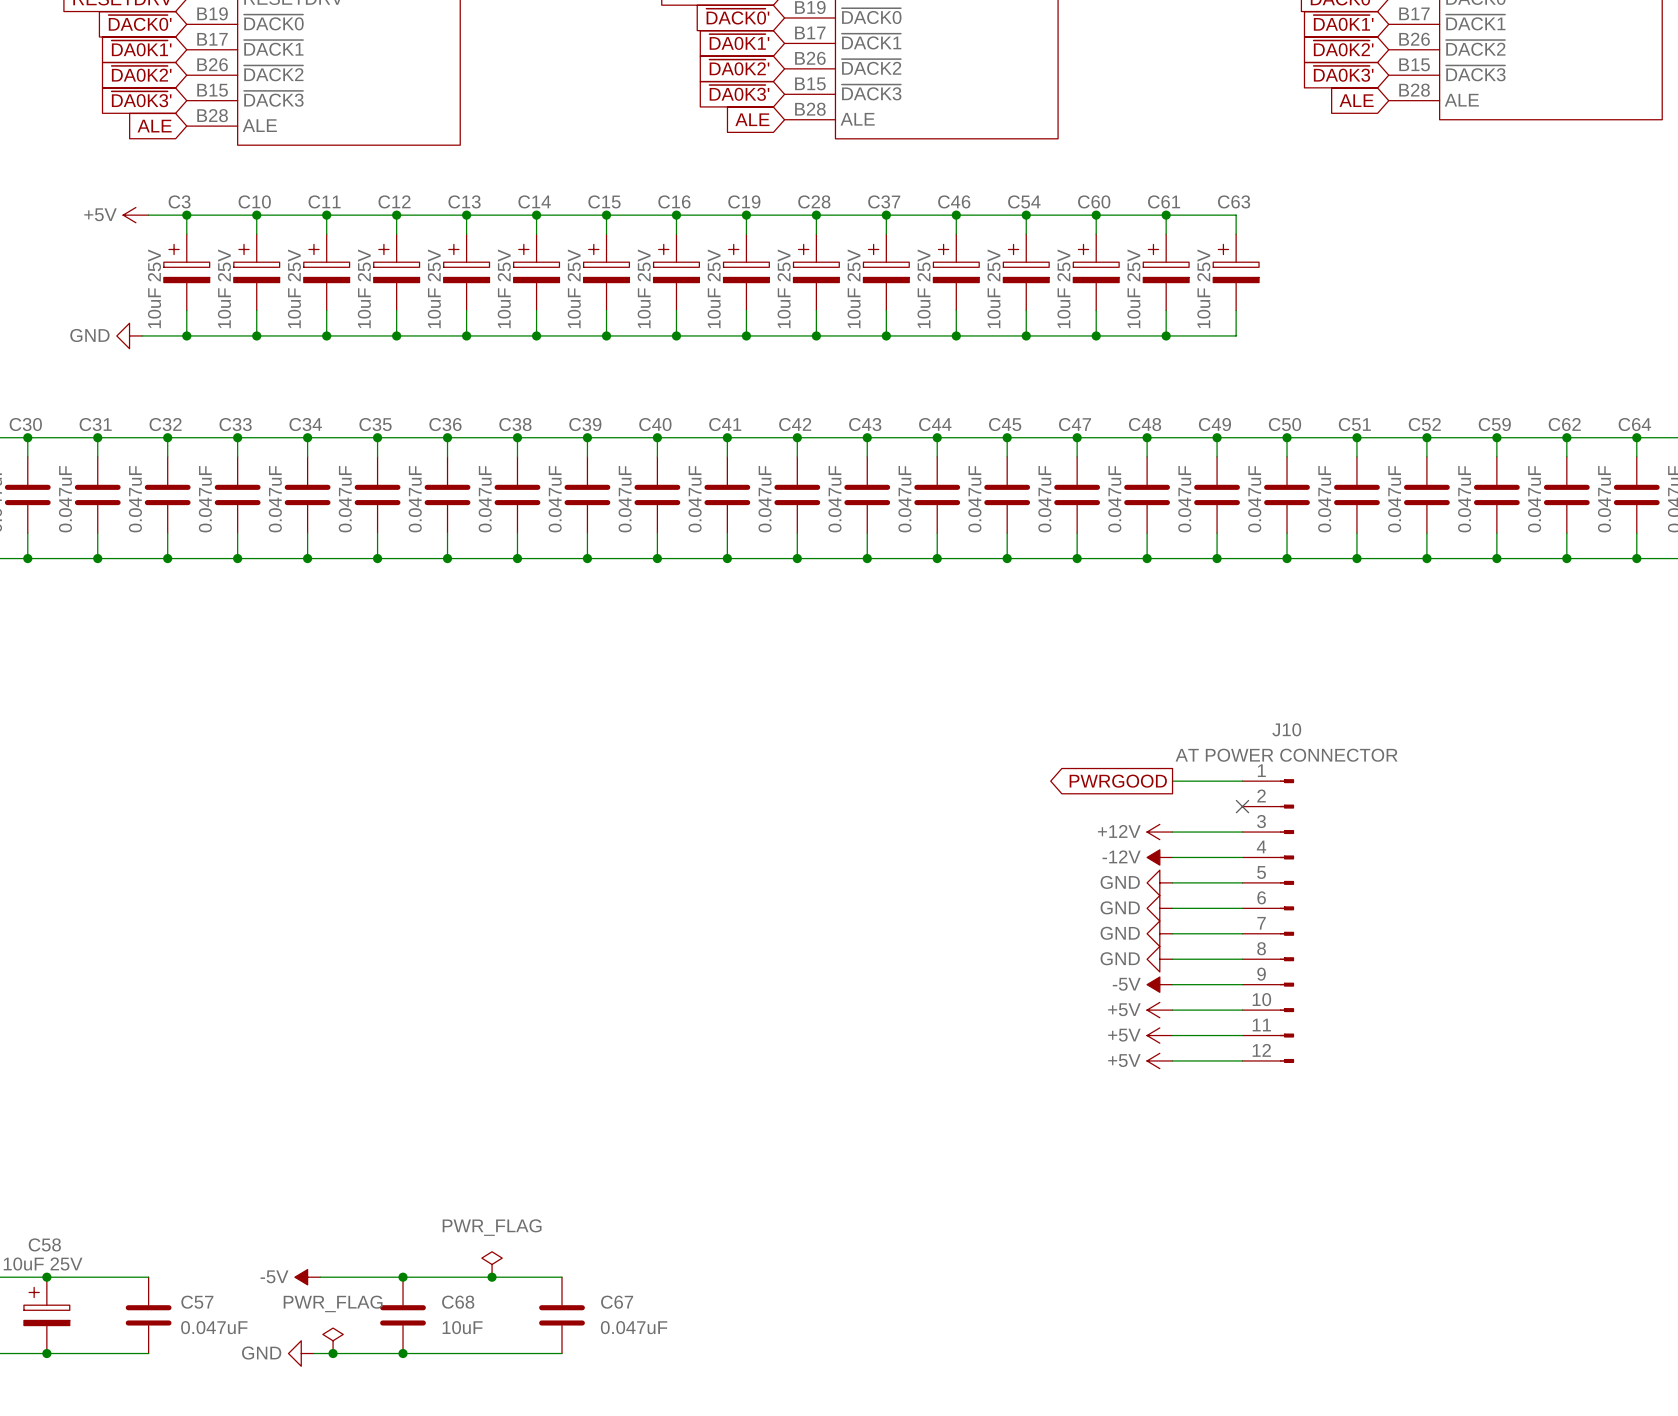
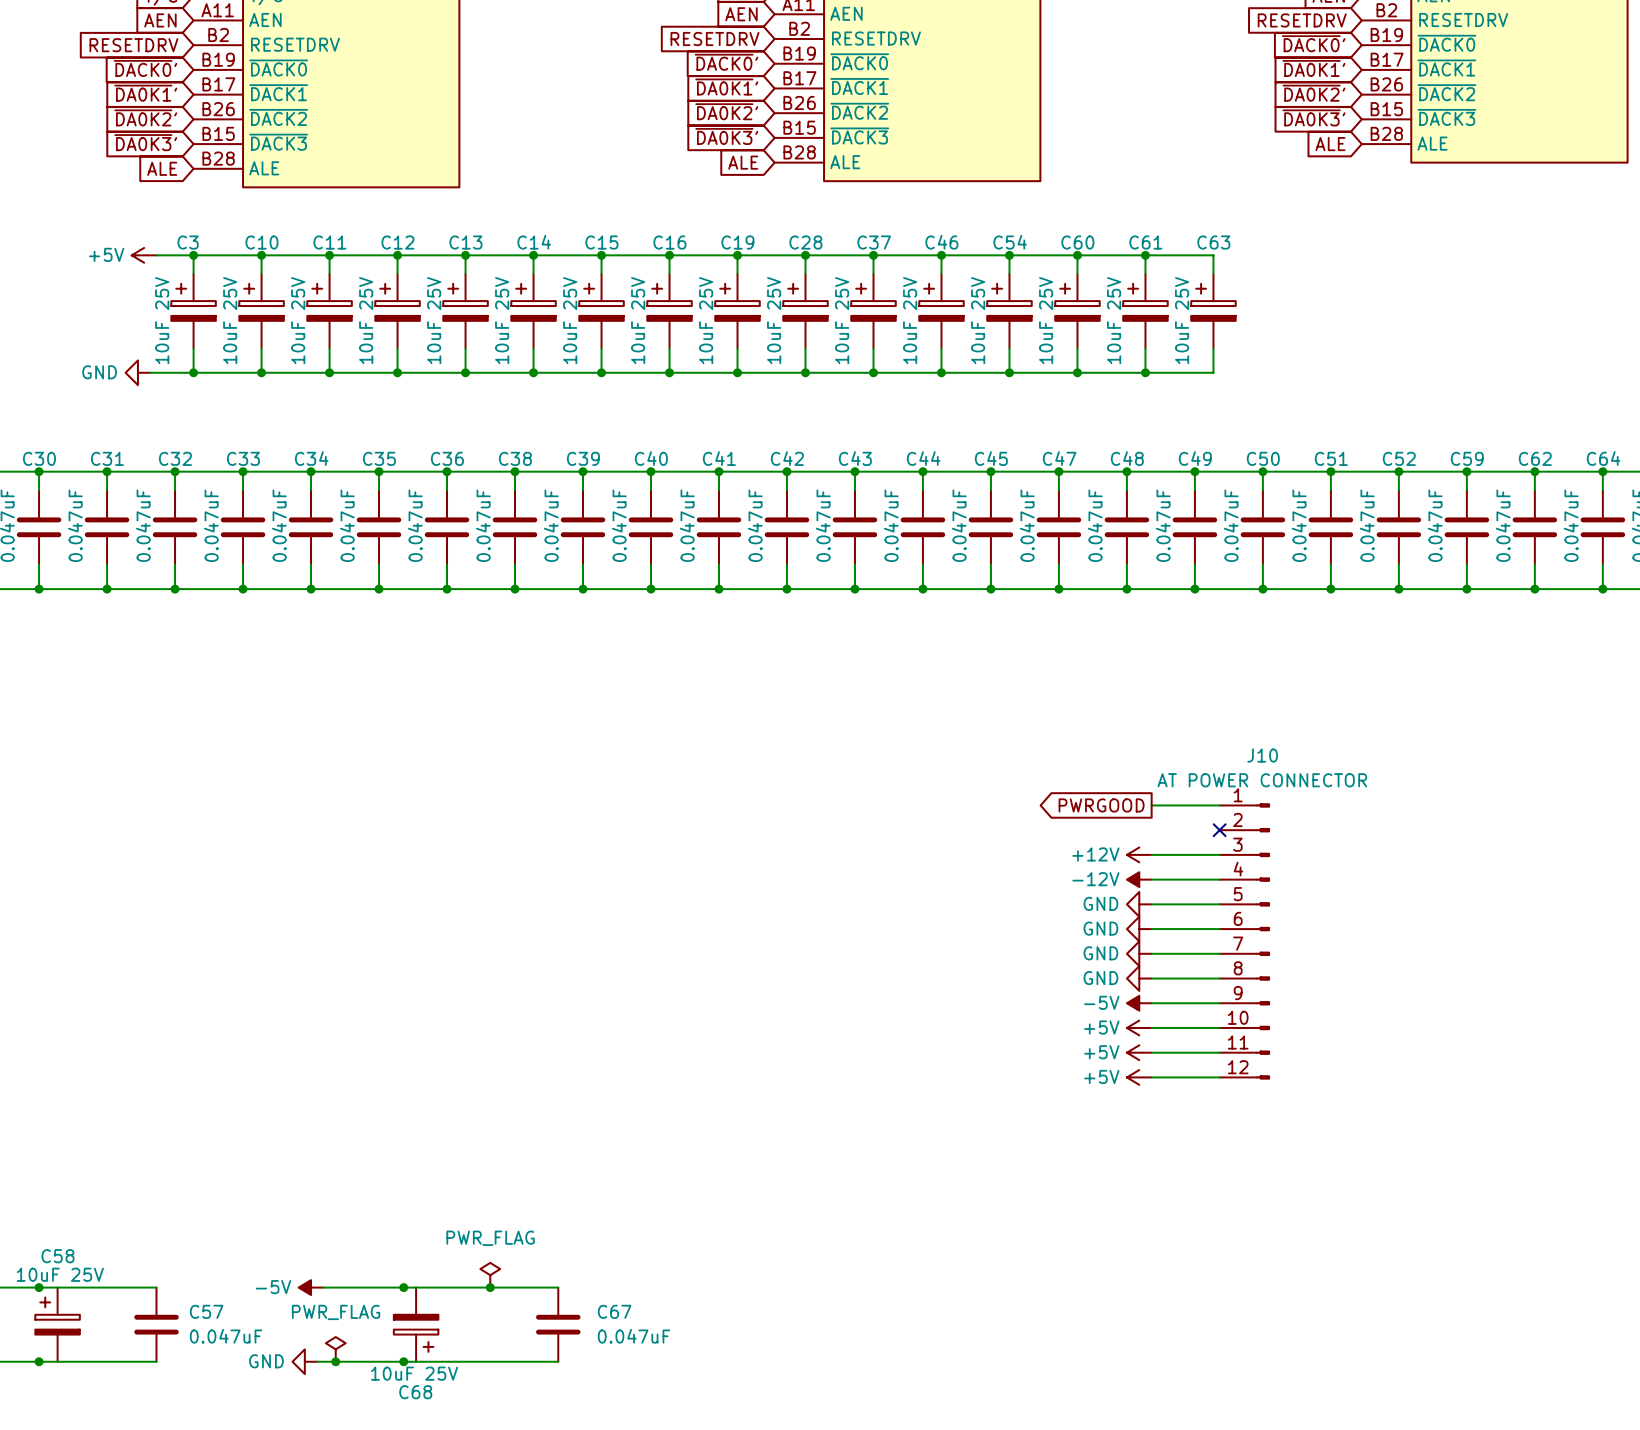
junction position: (46, 1277) -> (39, 1287)
C68 symbol: [380, 1277, 426, 1354] -> [393, 1287, 439, 1362]
C68 name position: C68 (458, 1302) -> C68 (415, 1392)
C68 value: 10uF (462, 1327) -> 10uF 25V (414, 1373)
junction position: (46, 1353) -> (39, 1361)

